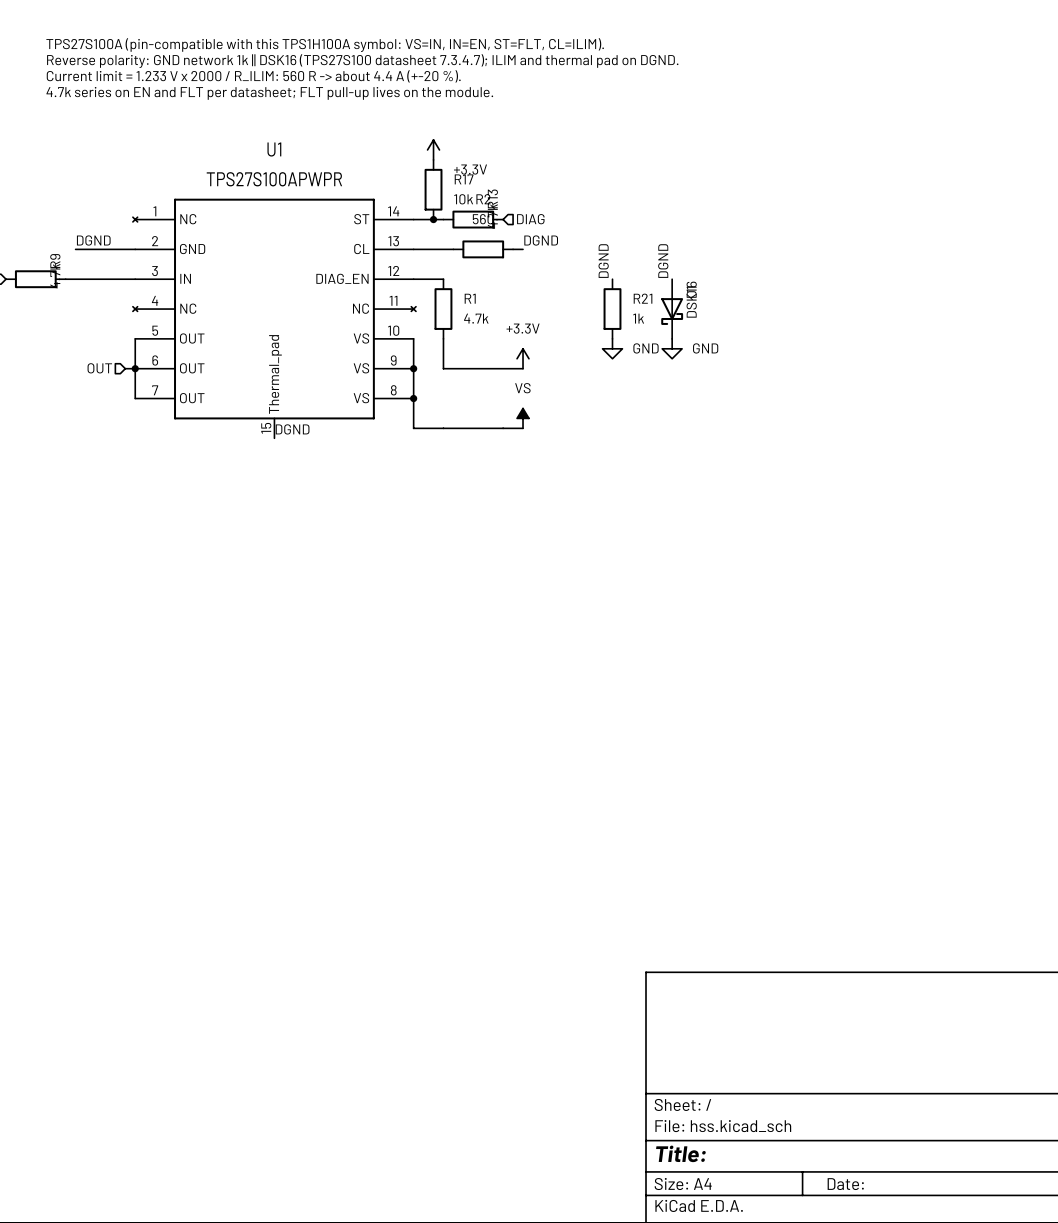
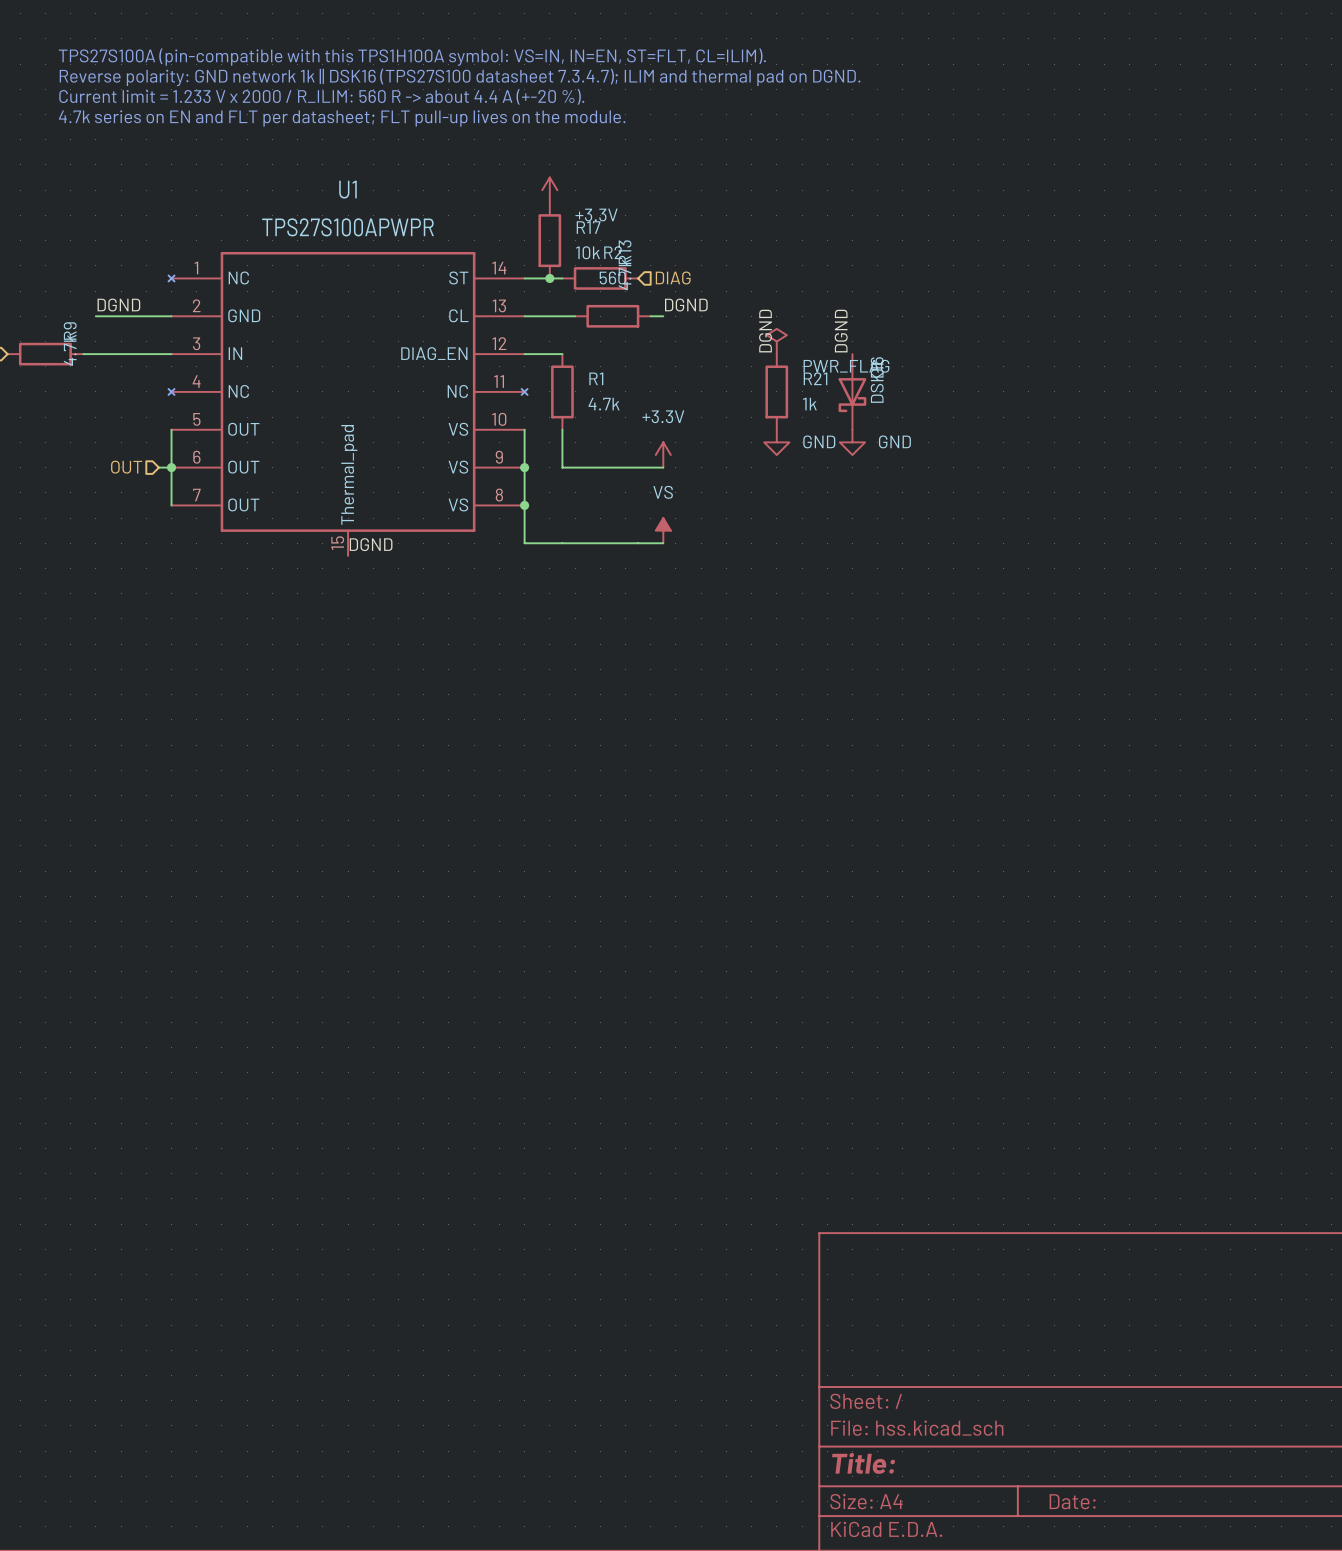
power symbol: none -> PWR_FLAG (776, 341)

